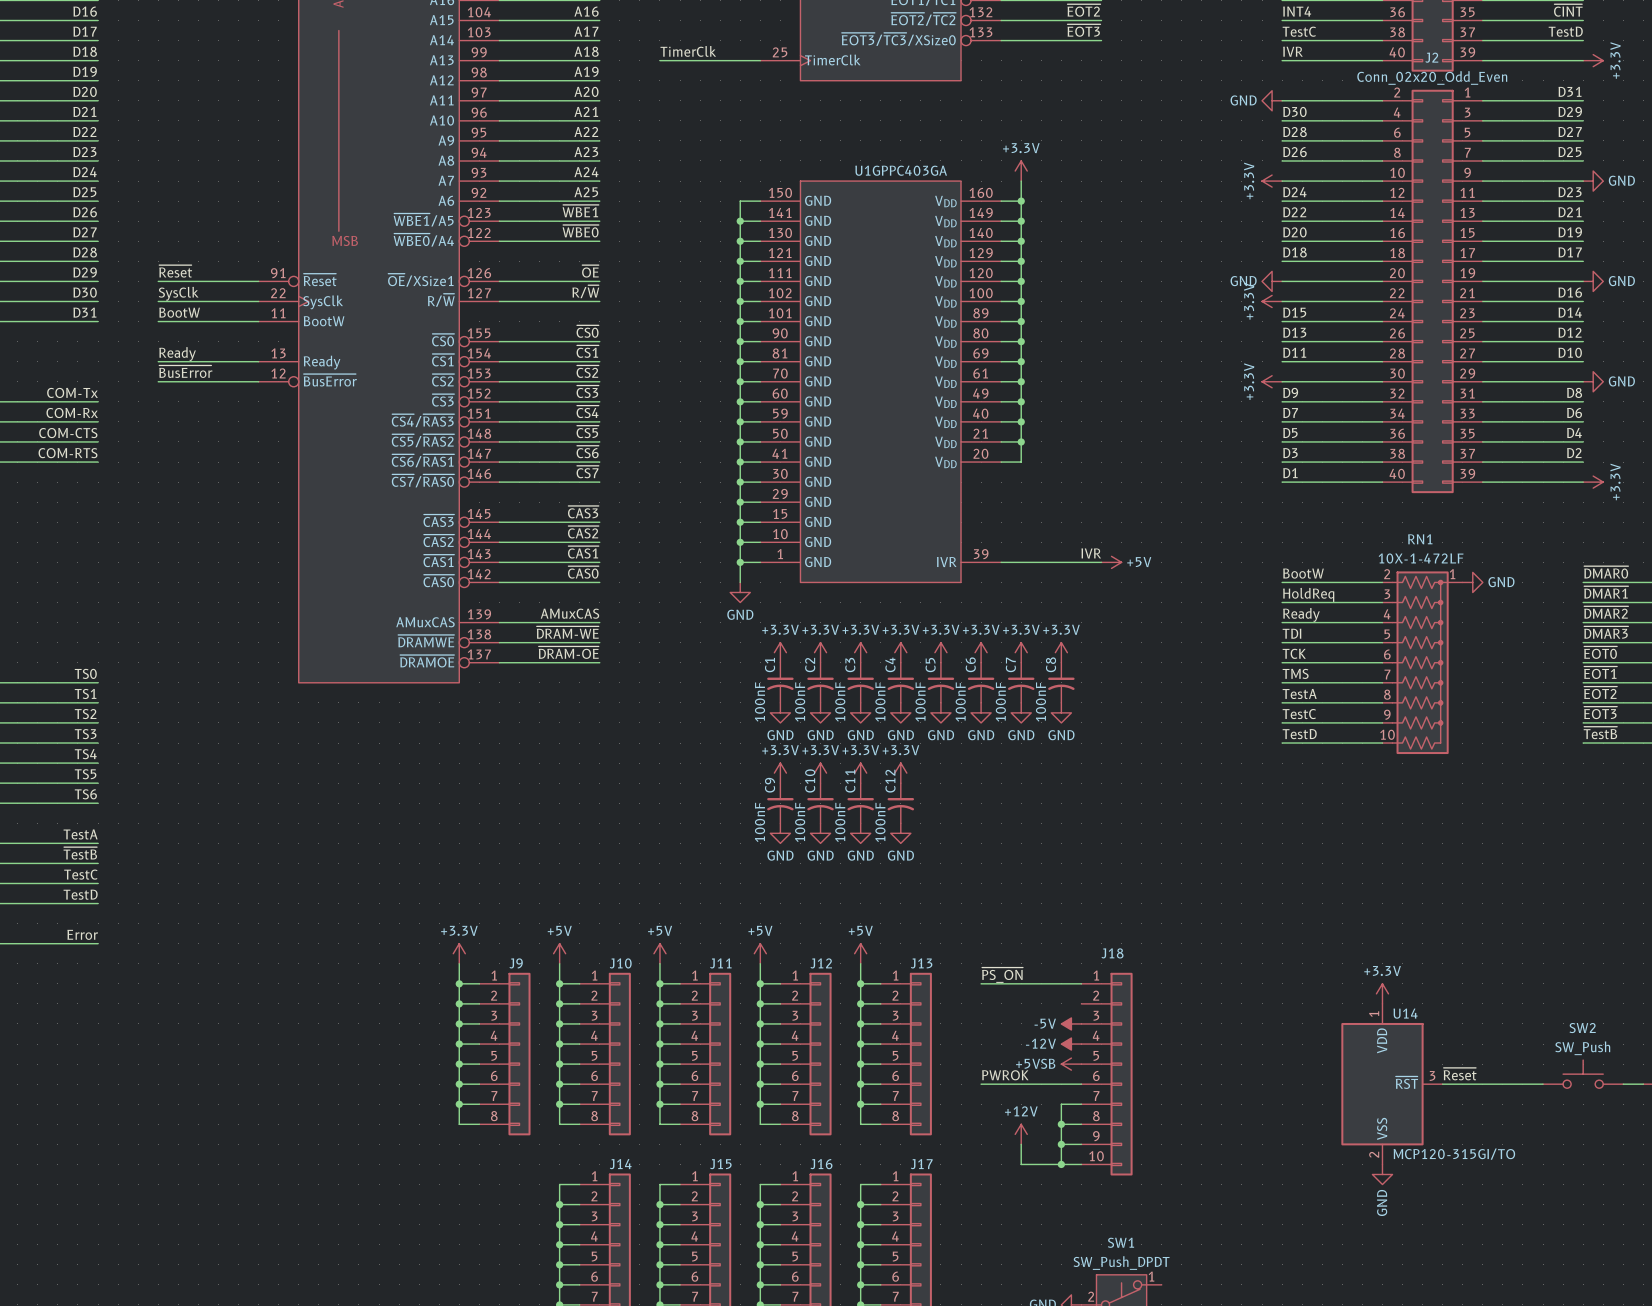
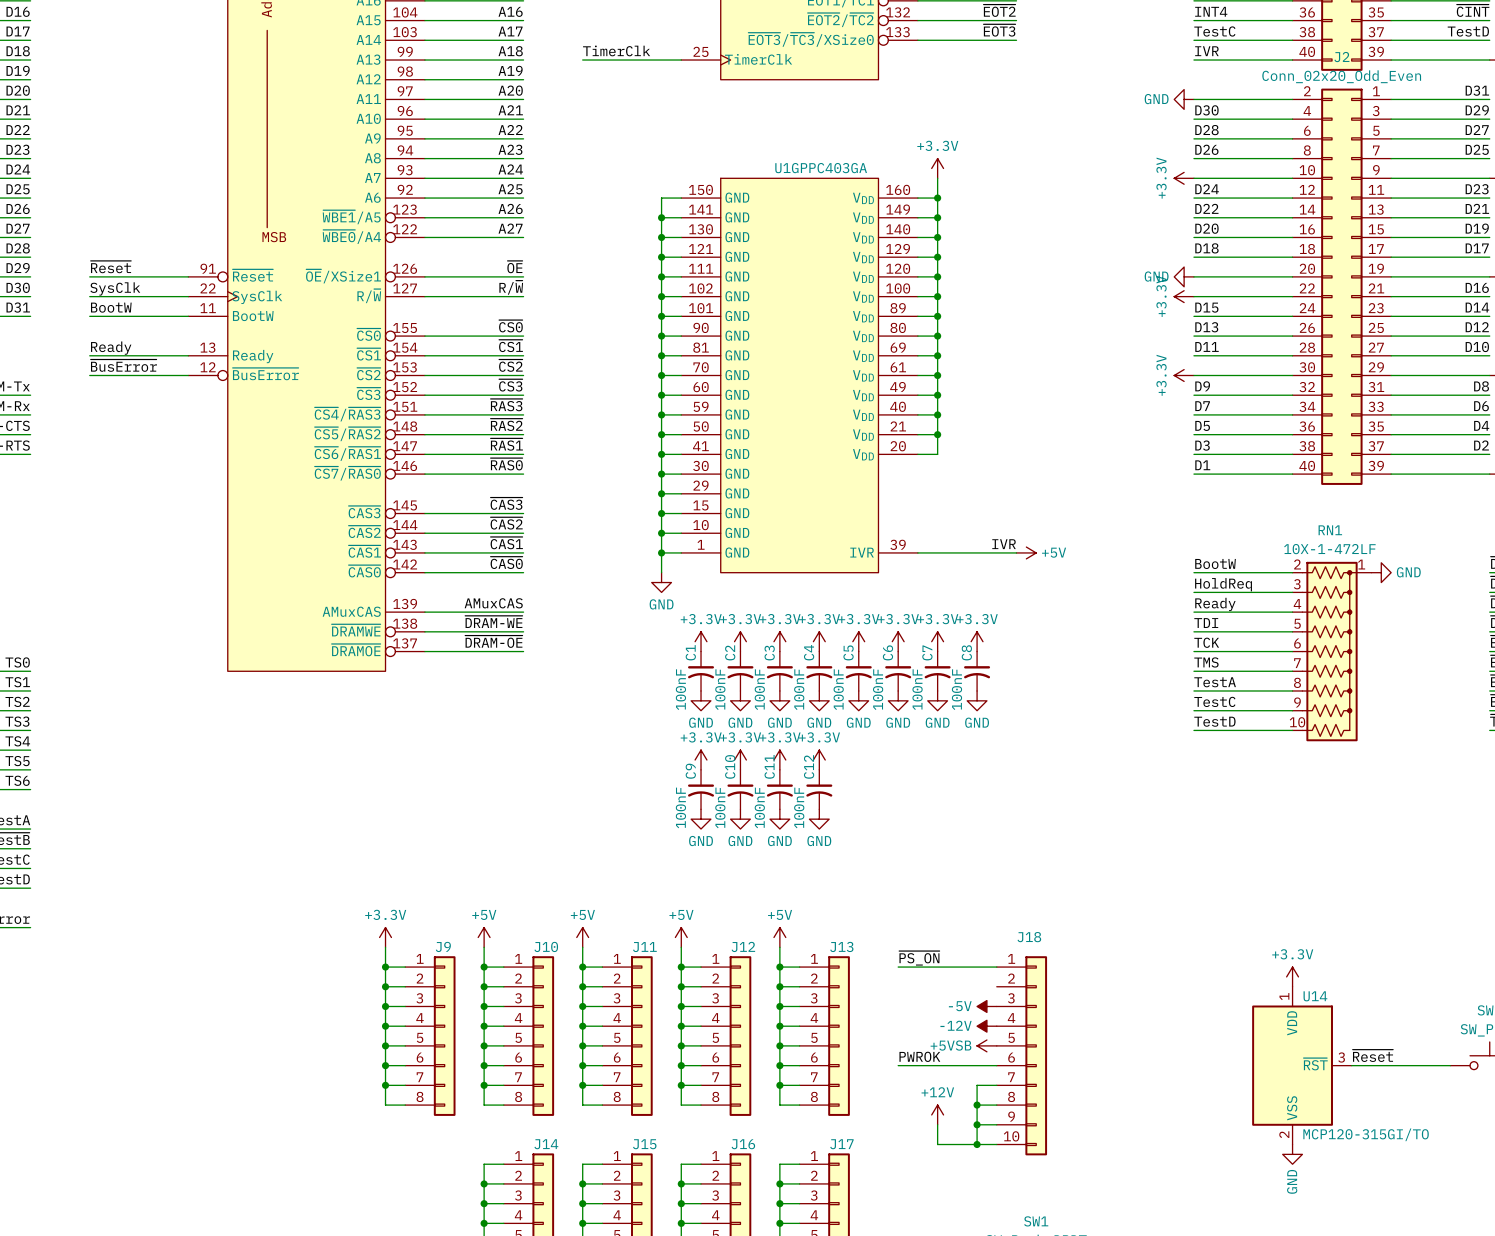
label: ~{WBE1} (580, 211) -> A26 (510, 208)
label: ~{WBE0} (580, 231) -> A27 (510, 228)
label: ~{CS4} (587, 411) -> ~{RAS3} (506, 405)
label: ~{CS5} (587, 431) -> ~{RAS2} (506, 424)
label: ~{CS6} (587, 451) -> ~{RAS1} (506, 444)
label: ~{CS7} (587, 472) -> ~{RAS0} (506, 464)

